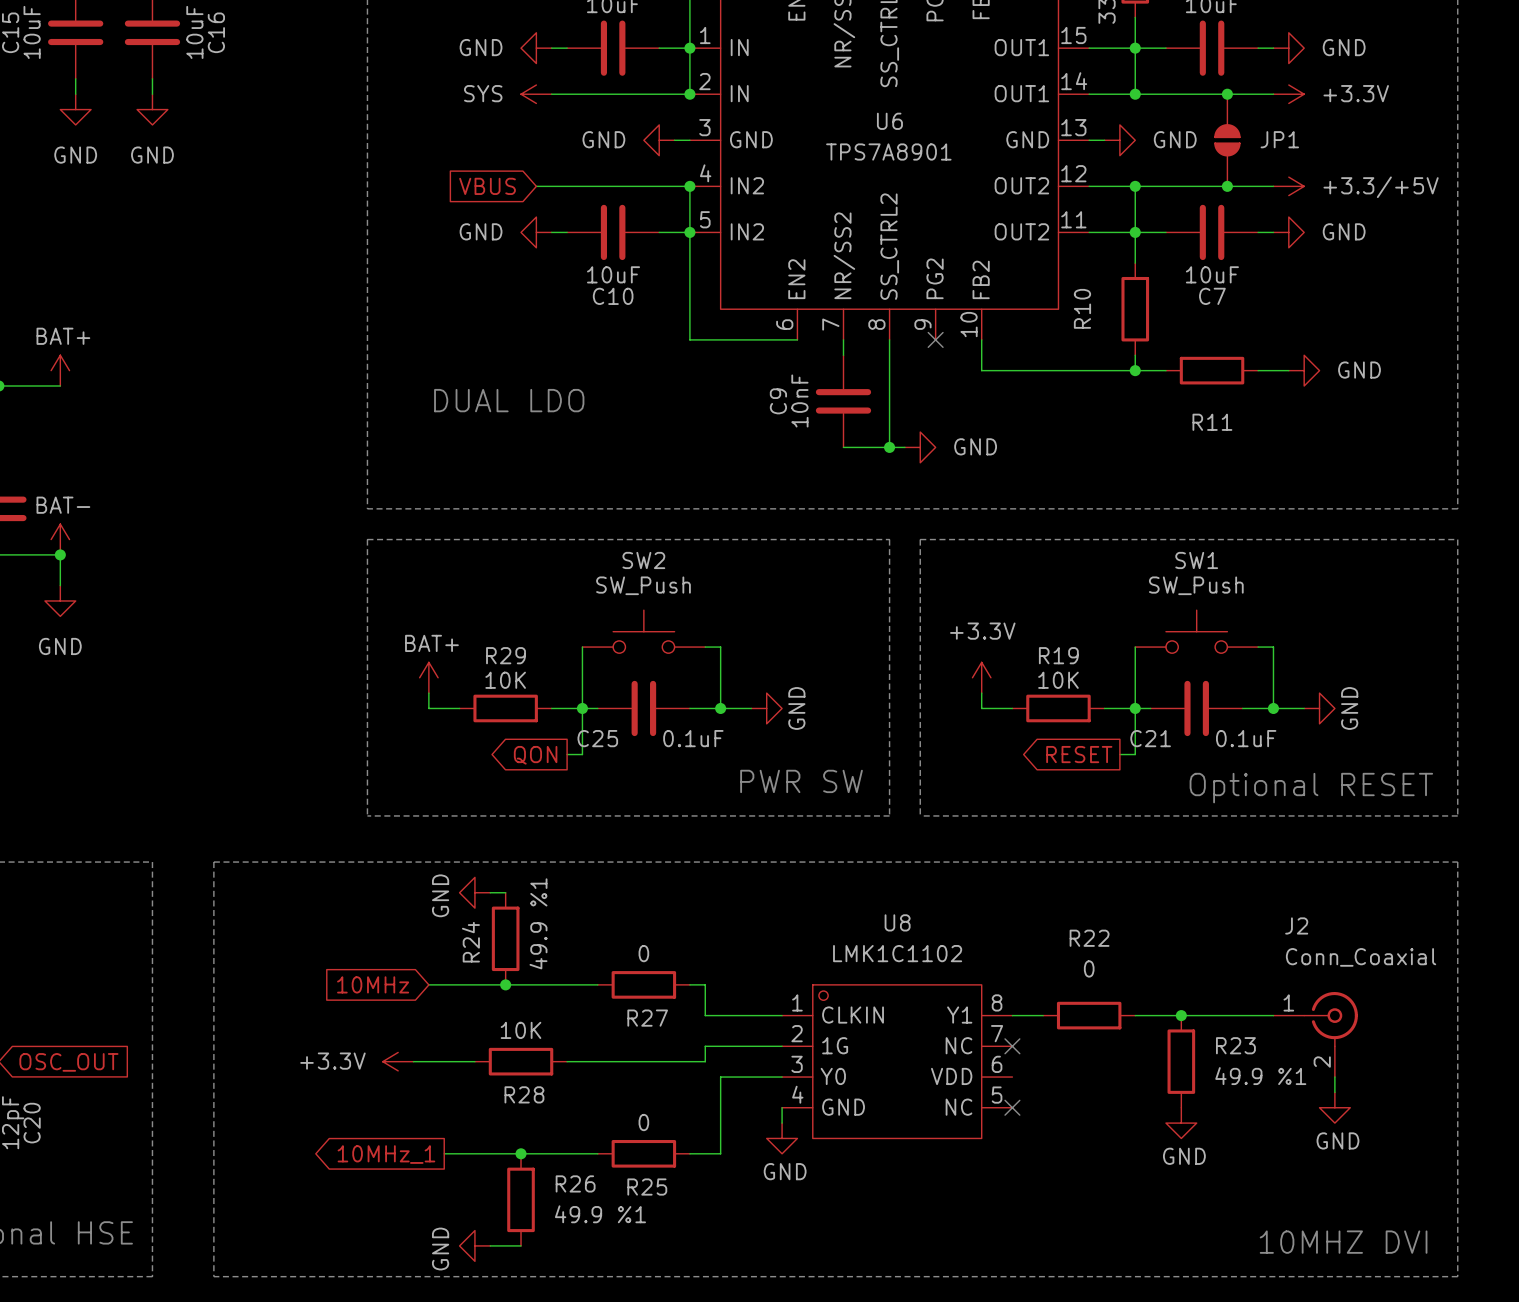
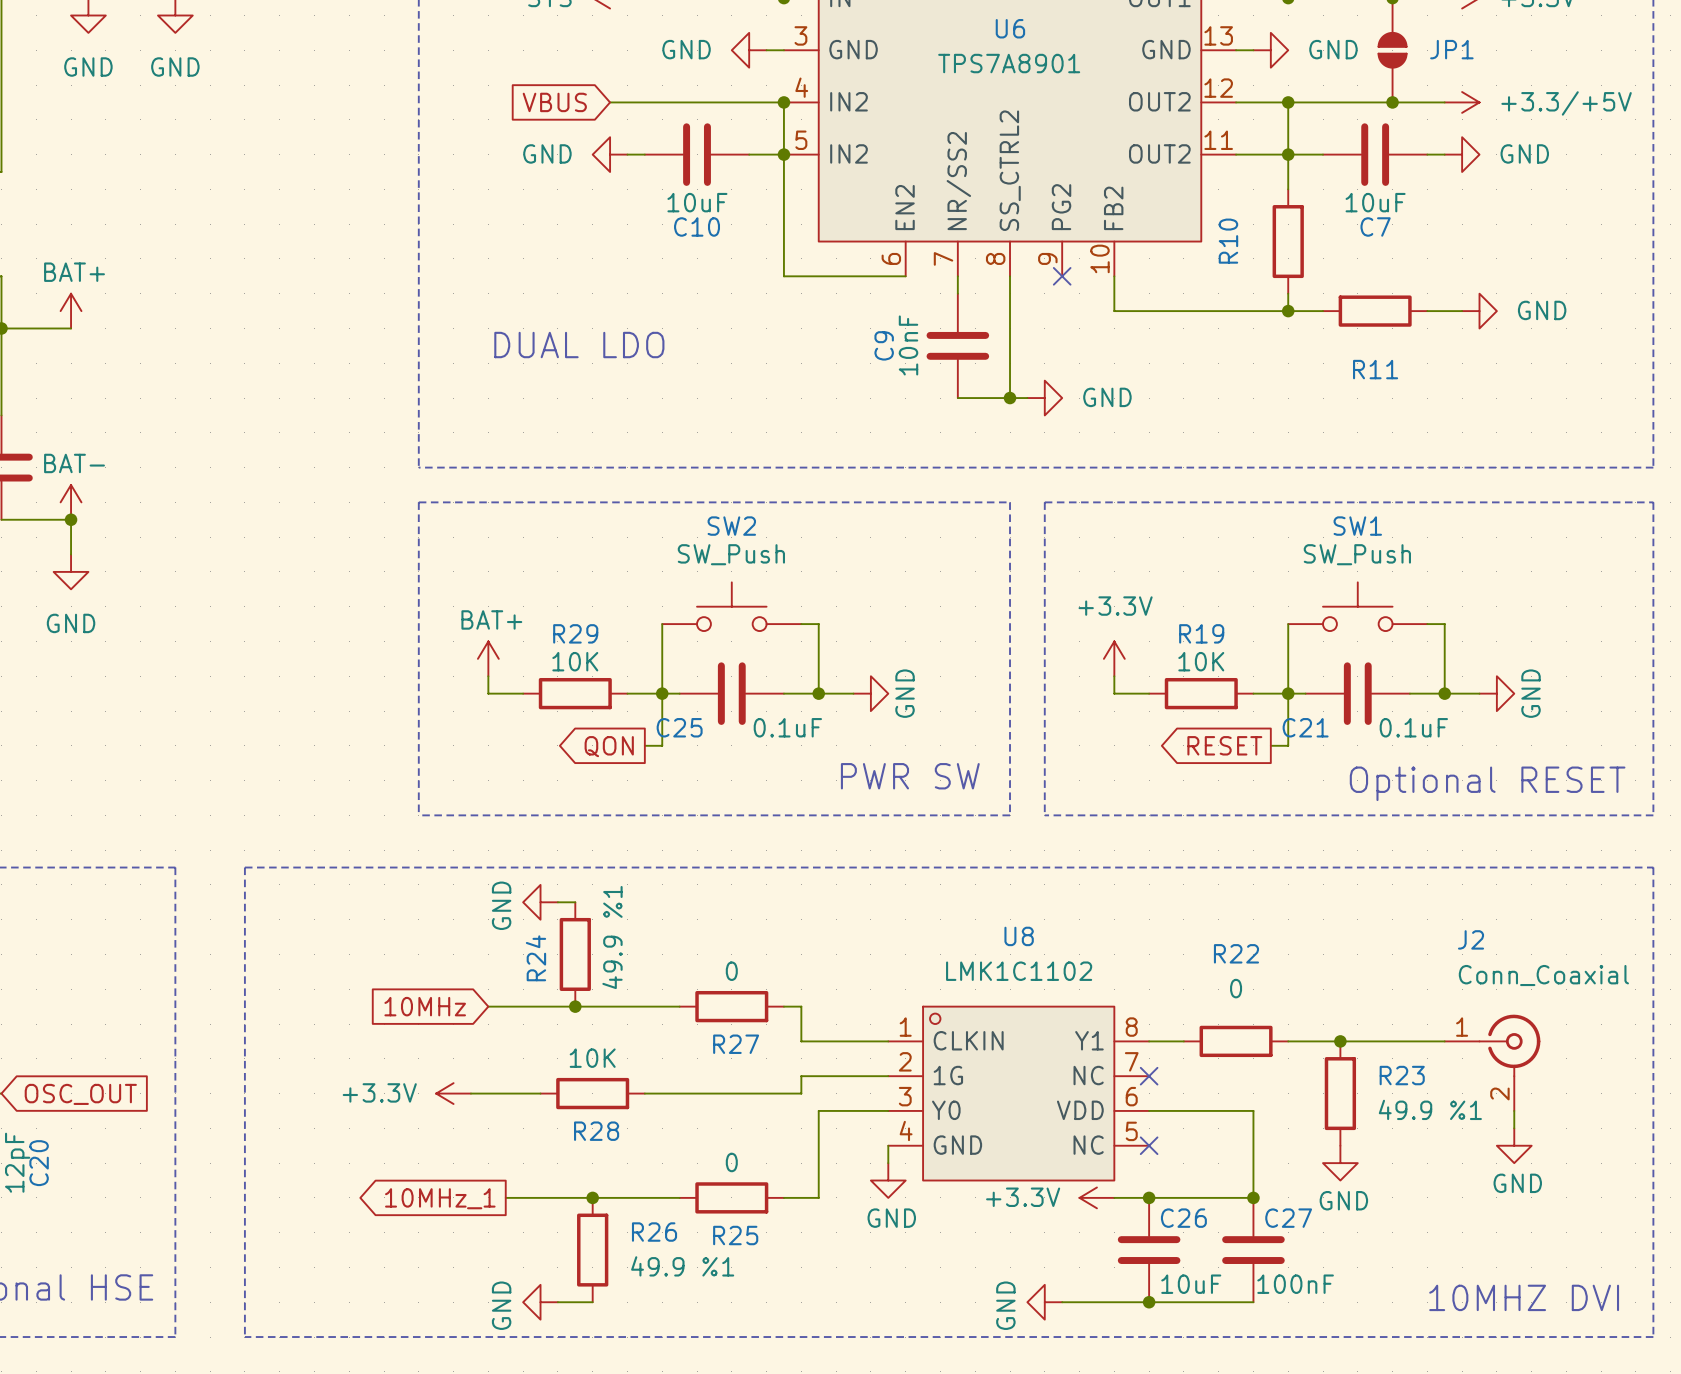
wire: none -> (1149, 1110) (1253, 1110) (1253, 1197) (1114, 1197)
power symbol: none -> +3.3V (1096, 1197)
junction: none -> (1149, 1197)
junction: none -> (1253, 1197)
C26: none -> 10uF (1149, 1250)
C27: none -> 100nF (1253, 1250)
power symbol: none -> GND (1044, 1302)
wire: none -> (1062, 1302) (1253, 1302)
junction: none -> (1149, 1302)

